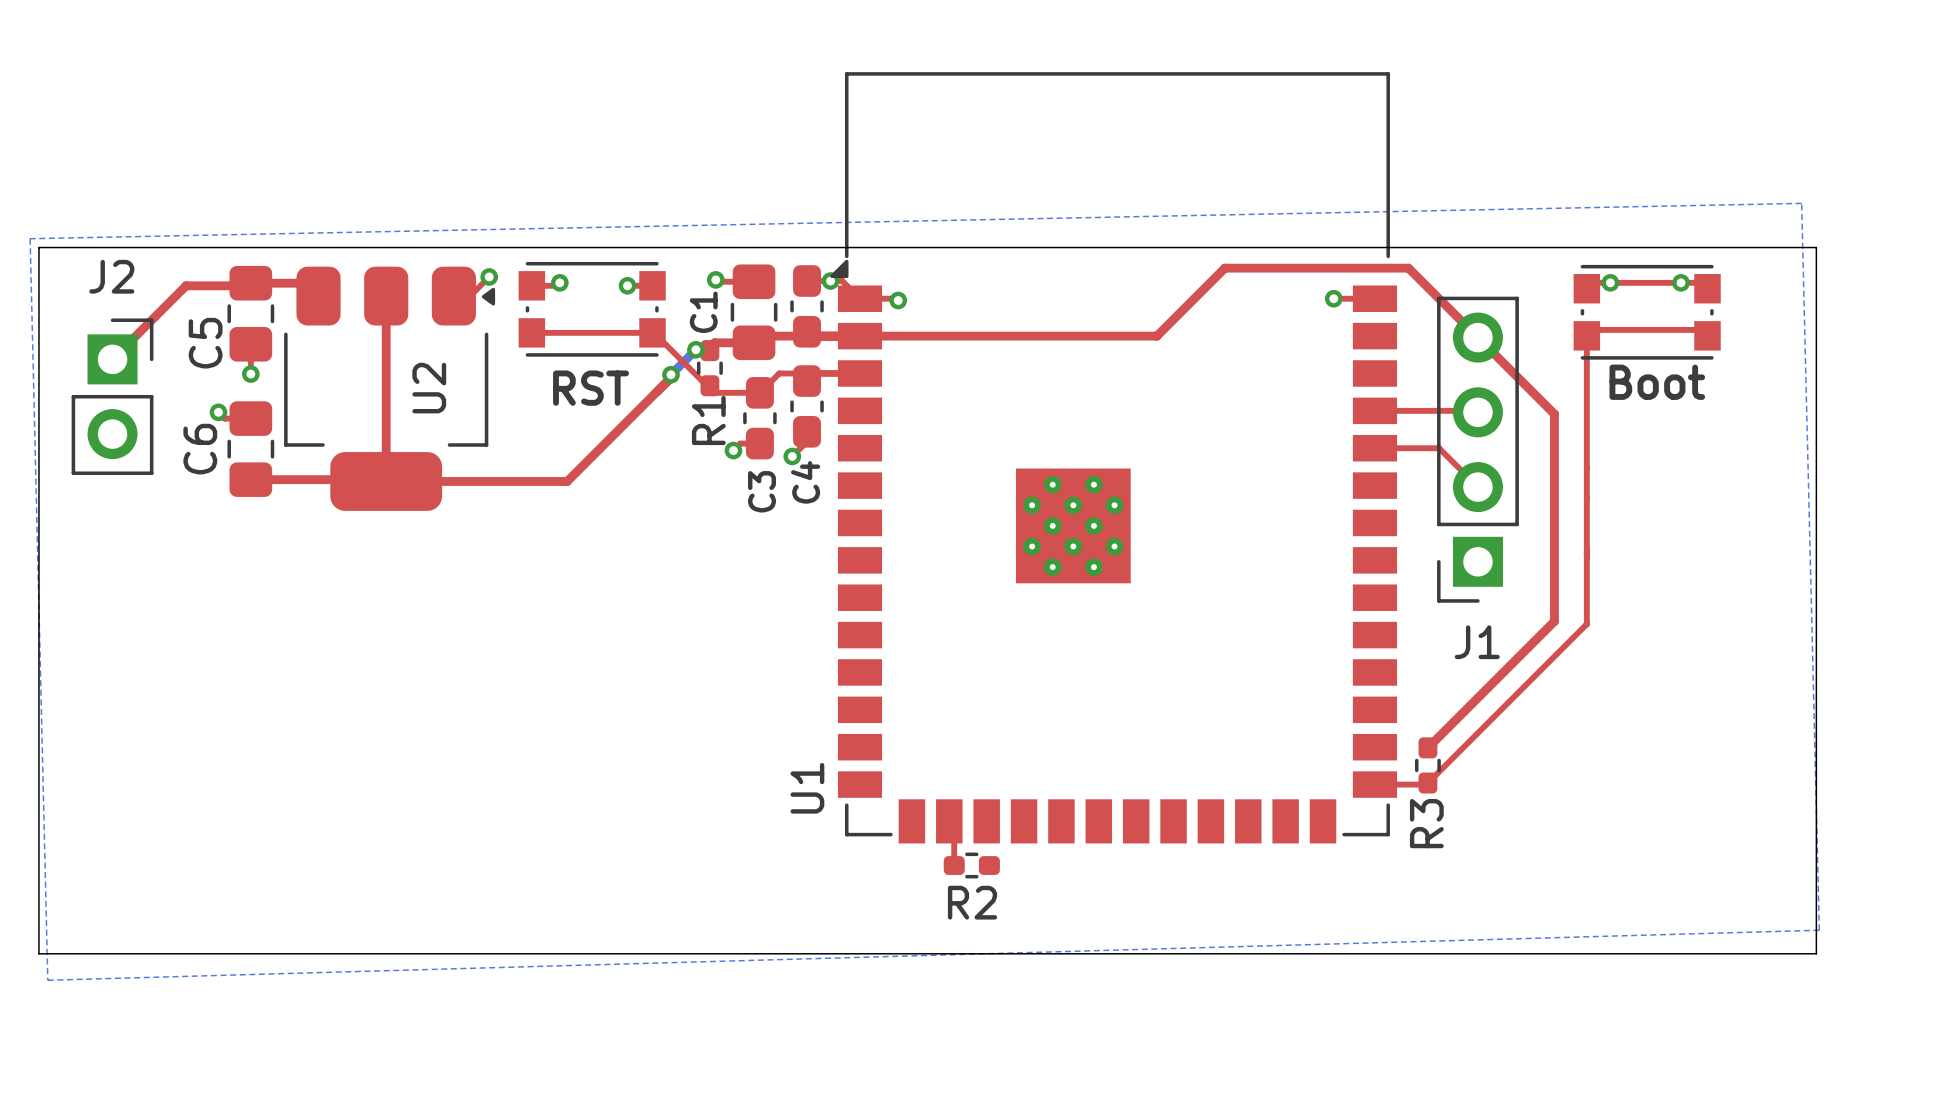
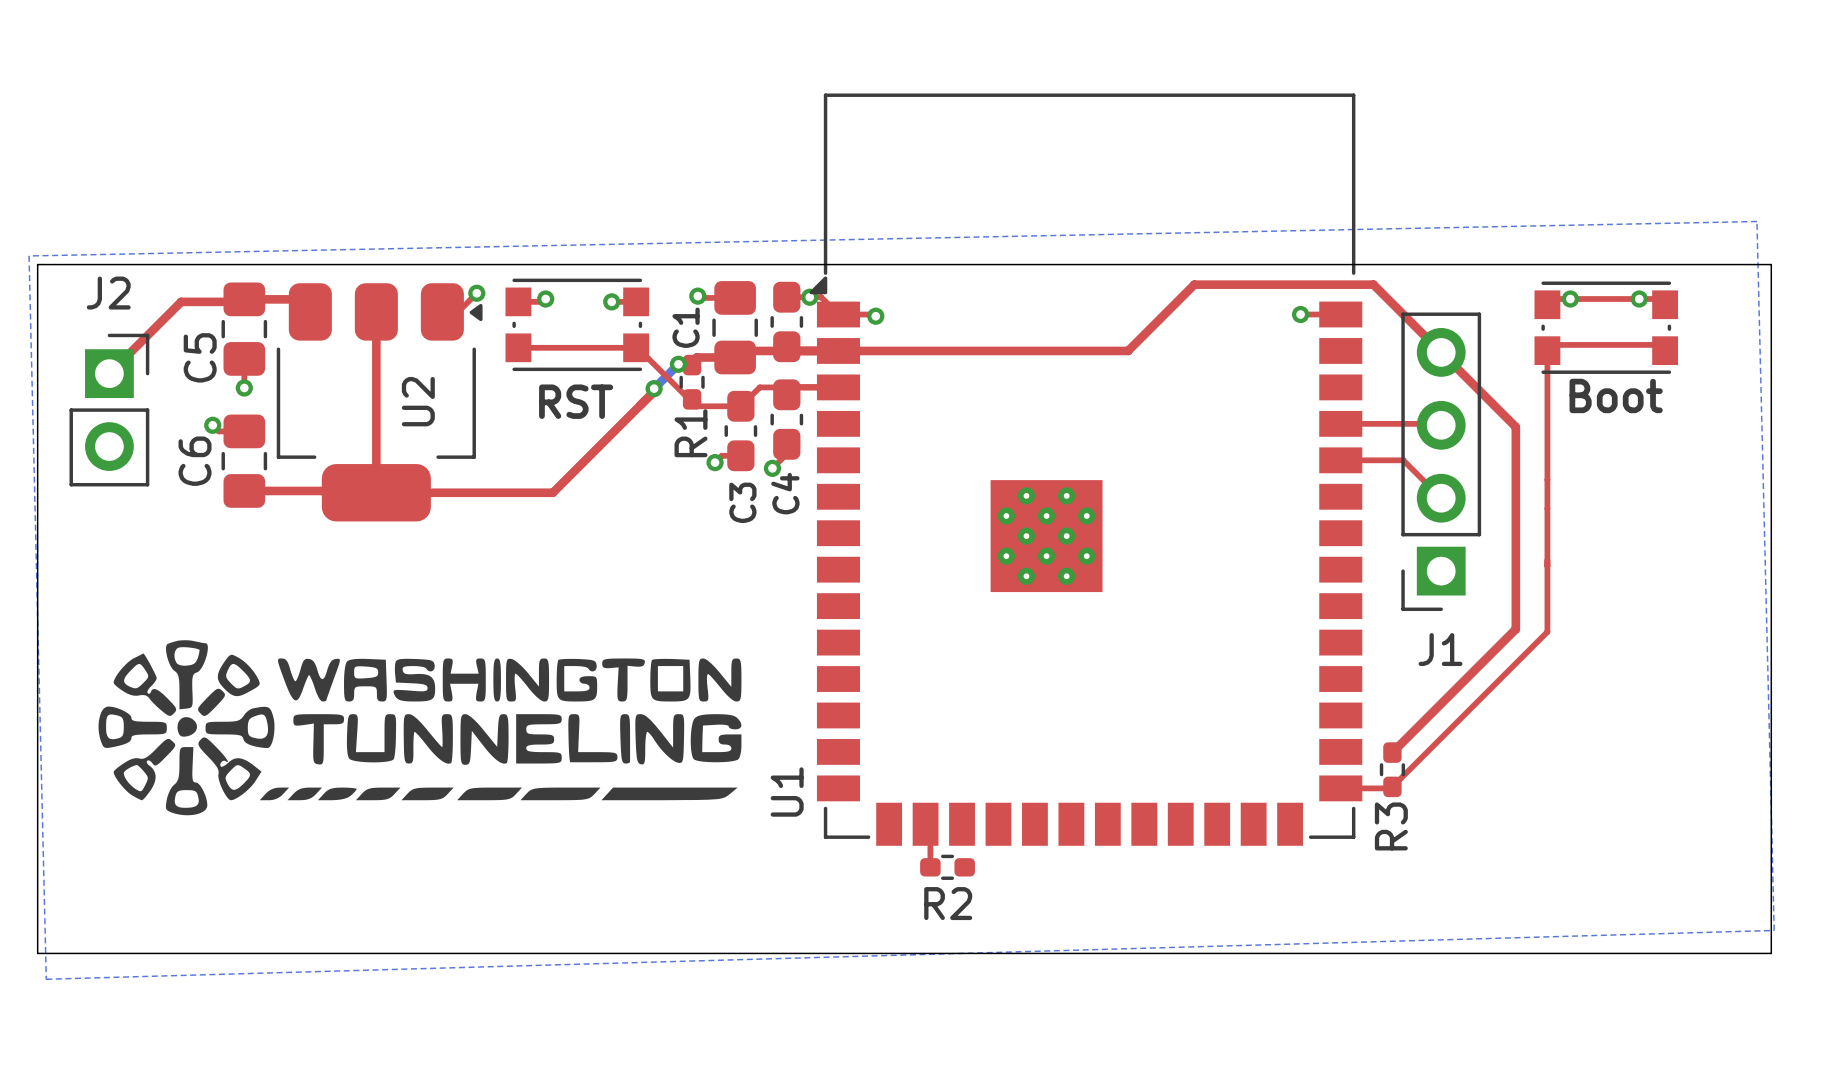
drawing: none -> [98, 640, 742, 816]

